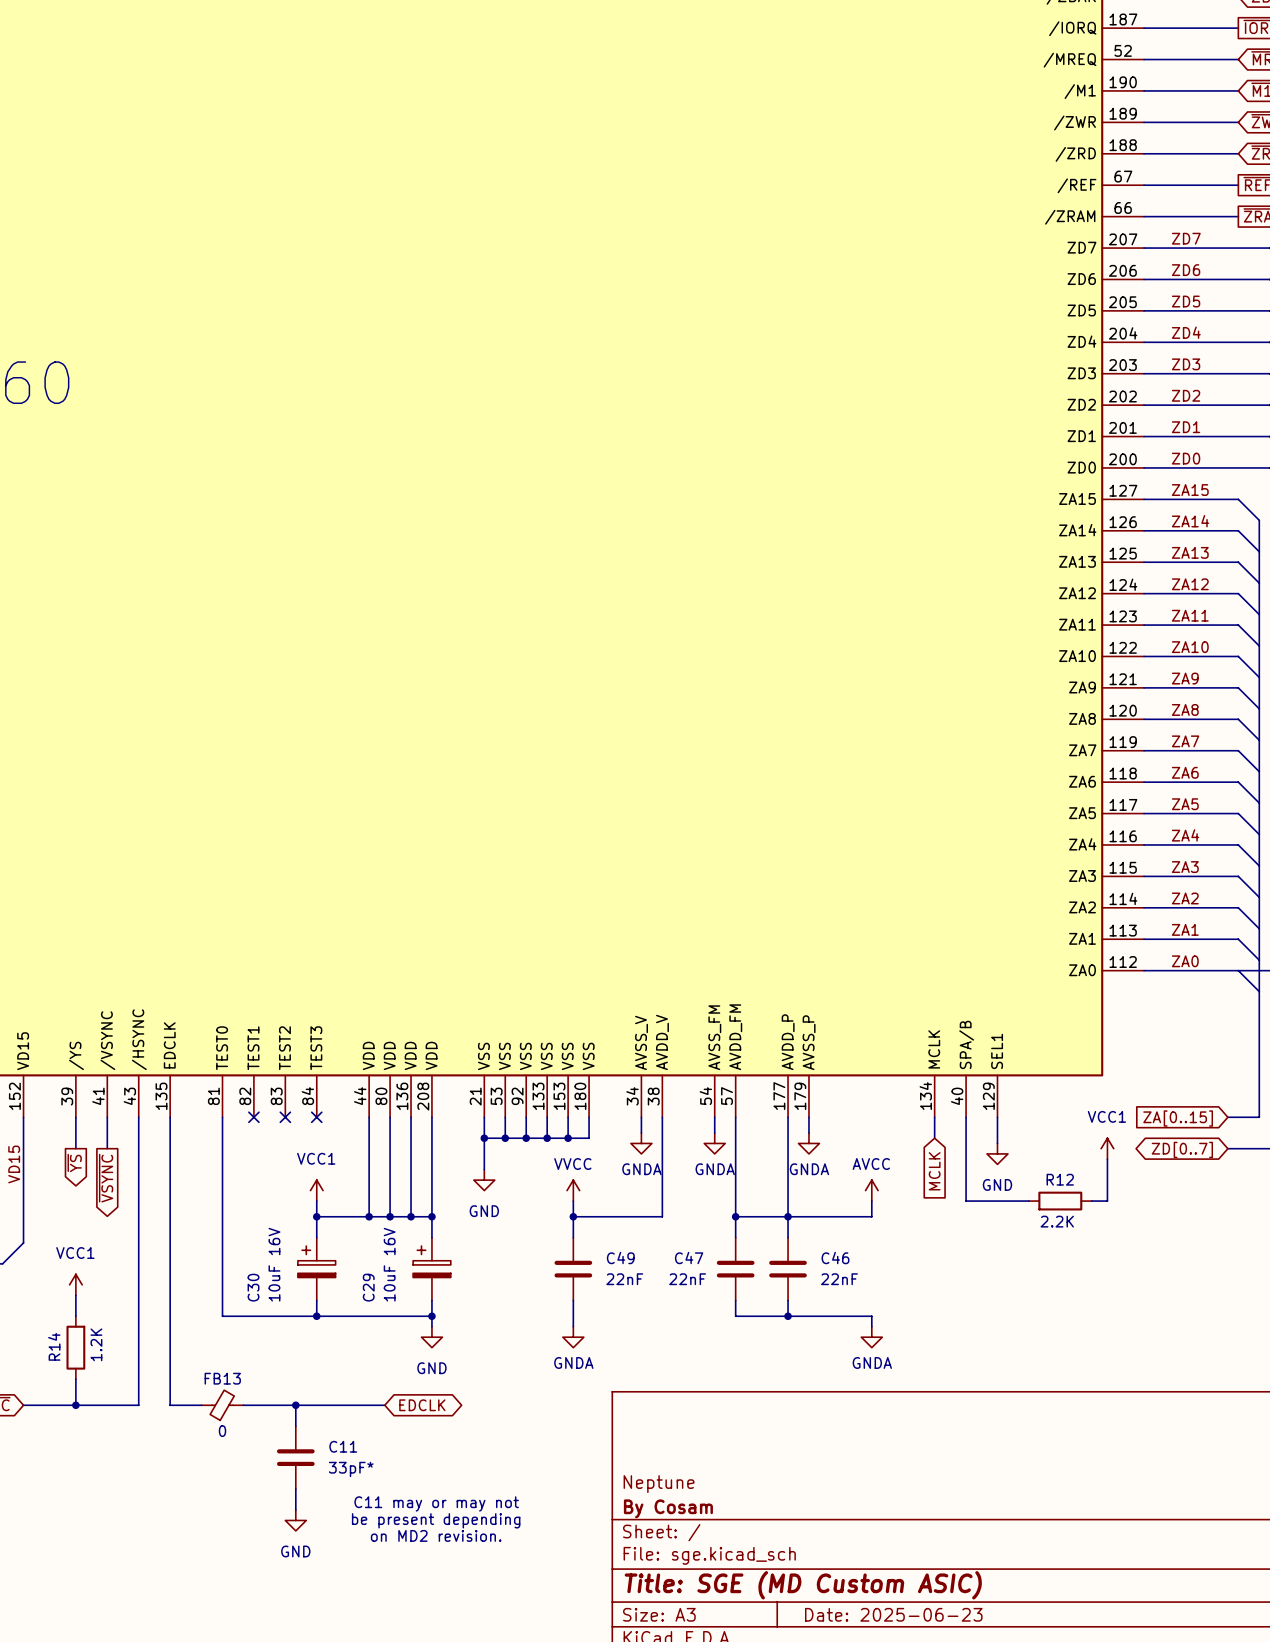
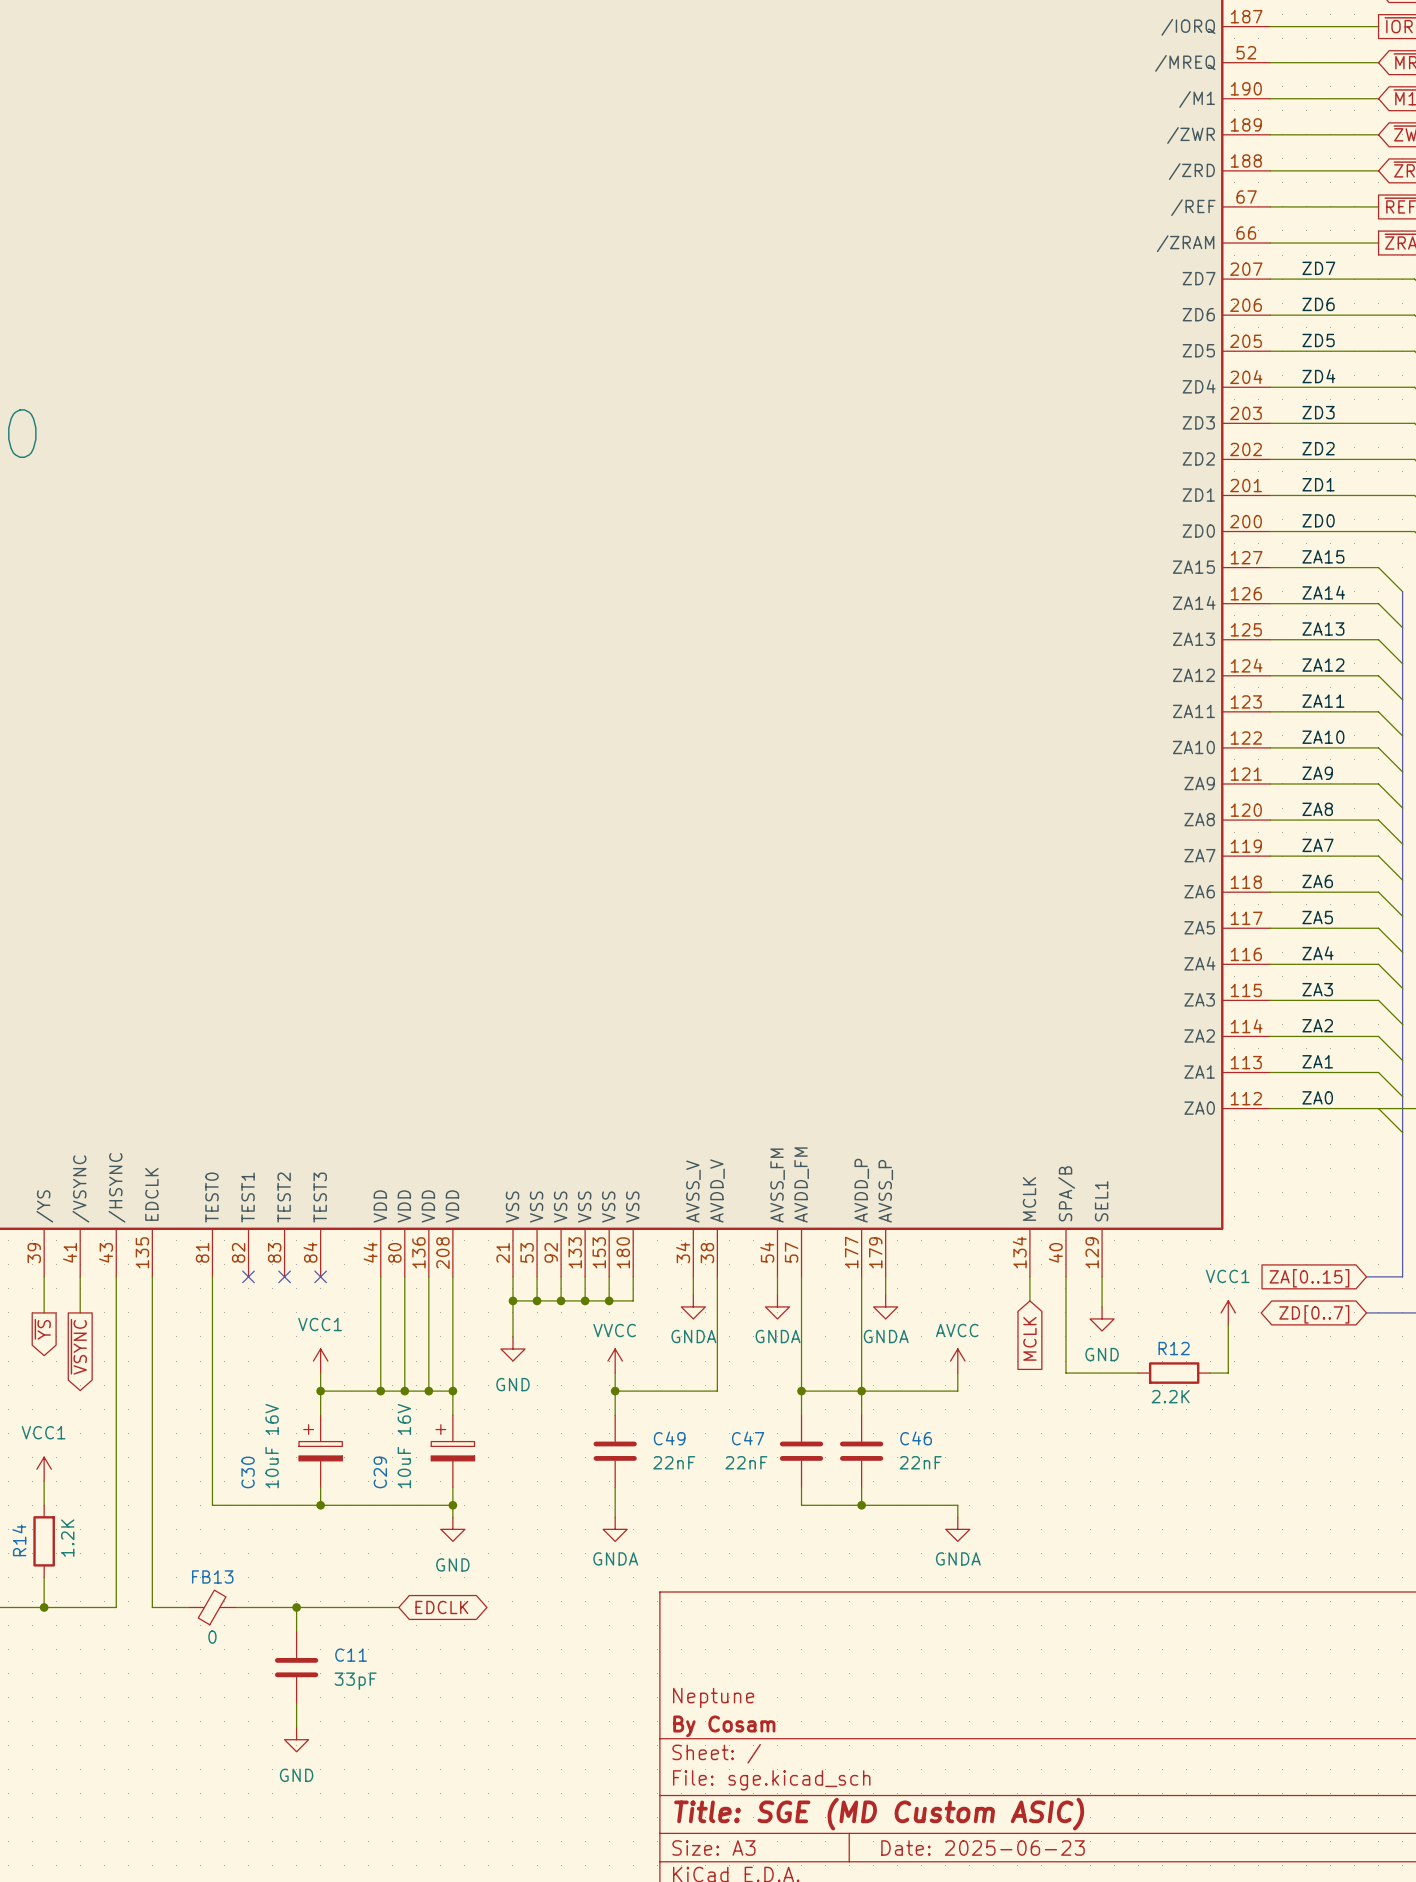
C11 value: 33pF* (351, 1469) -> 33pF (355, 1681)
text: C11 may or may not (436, 1503) -> none
text: be present depending (436, 1520) -> none
text: on MD2 revision. (436, 1535) -> none

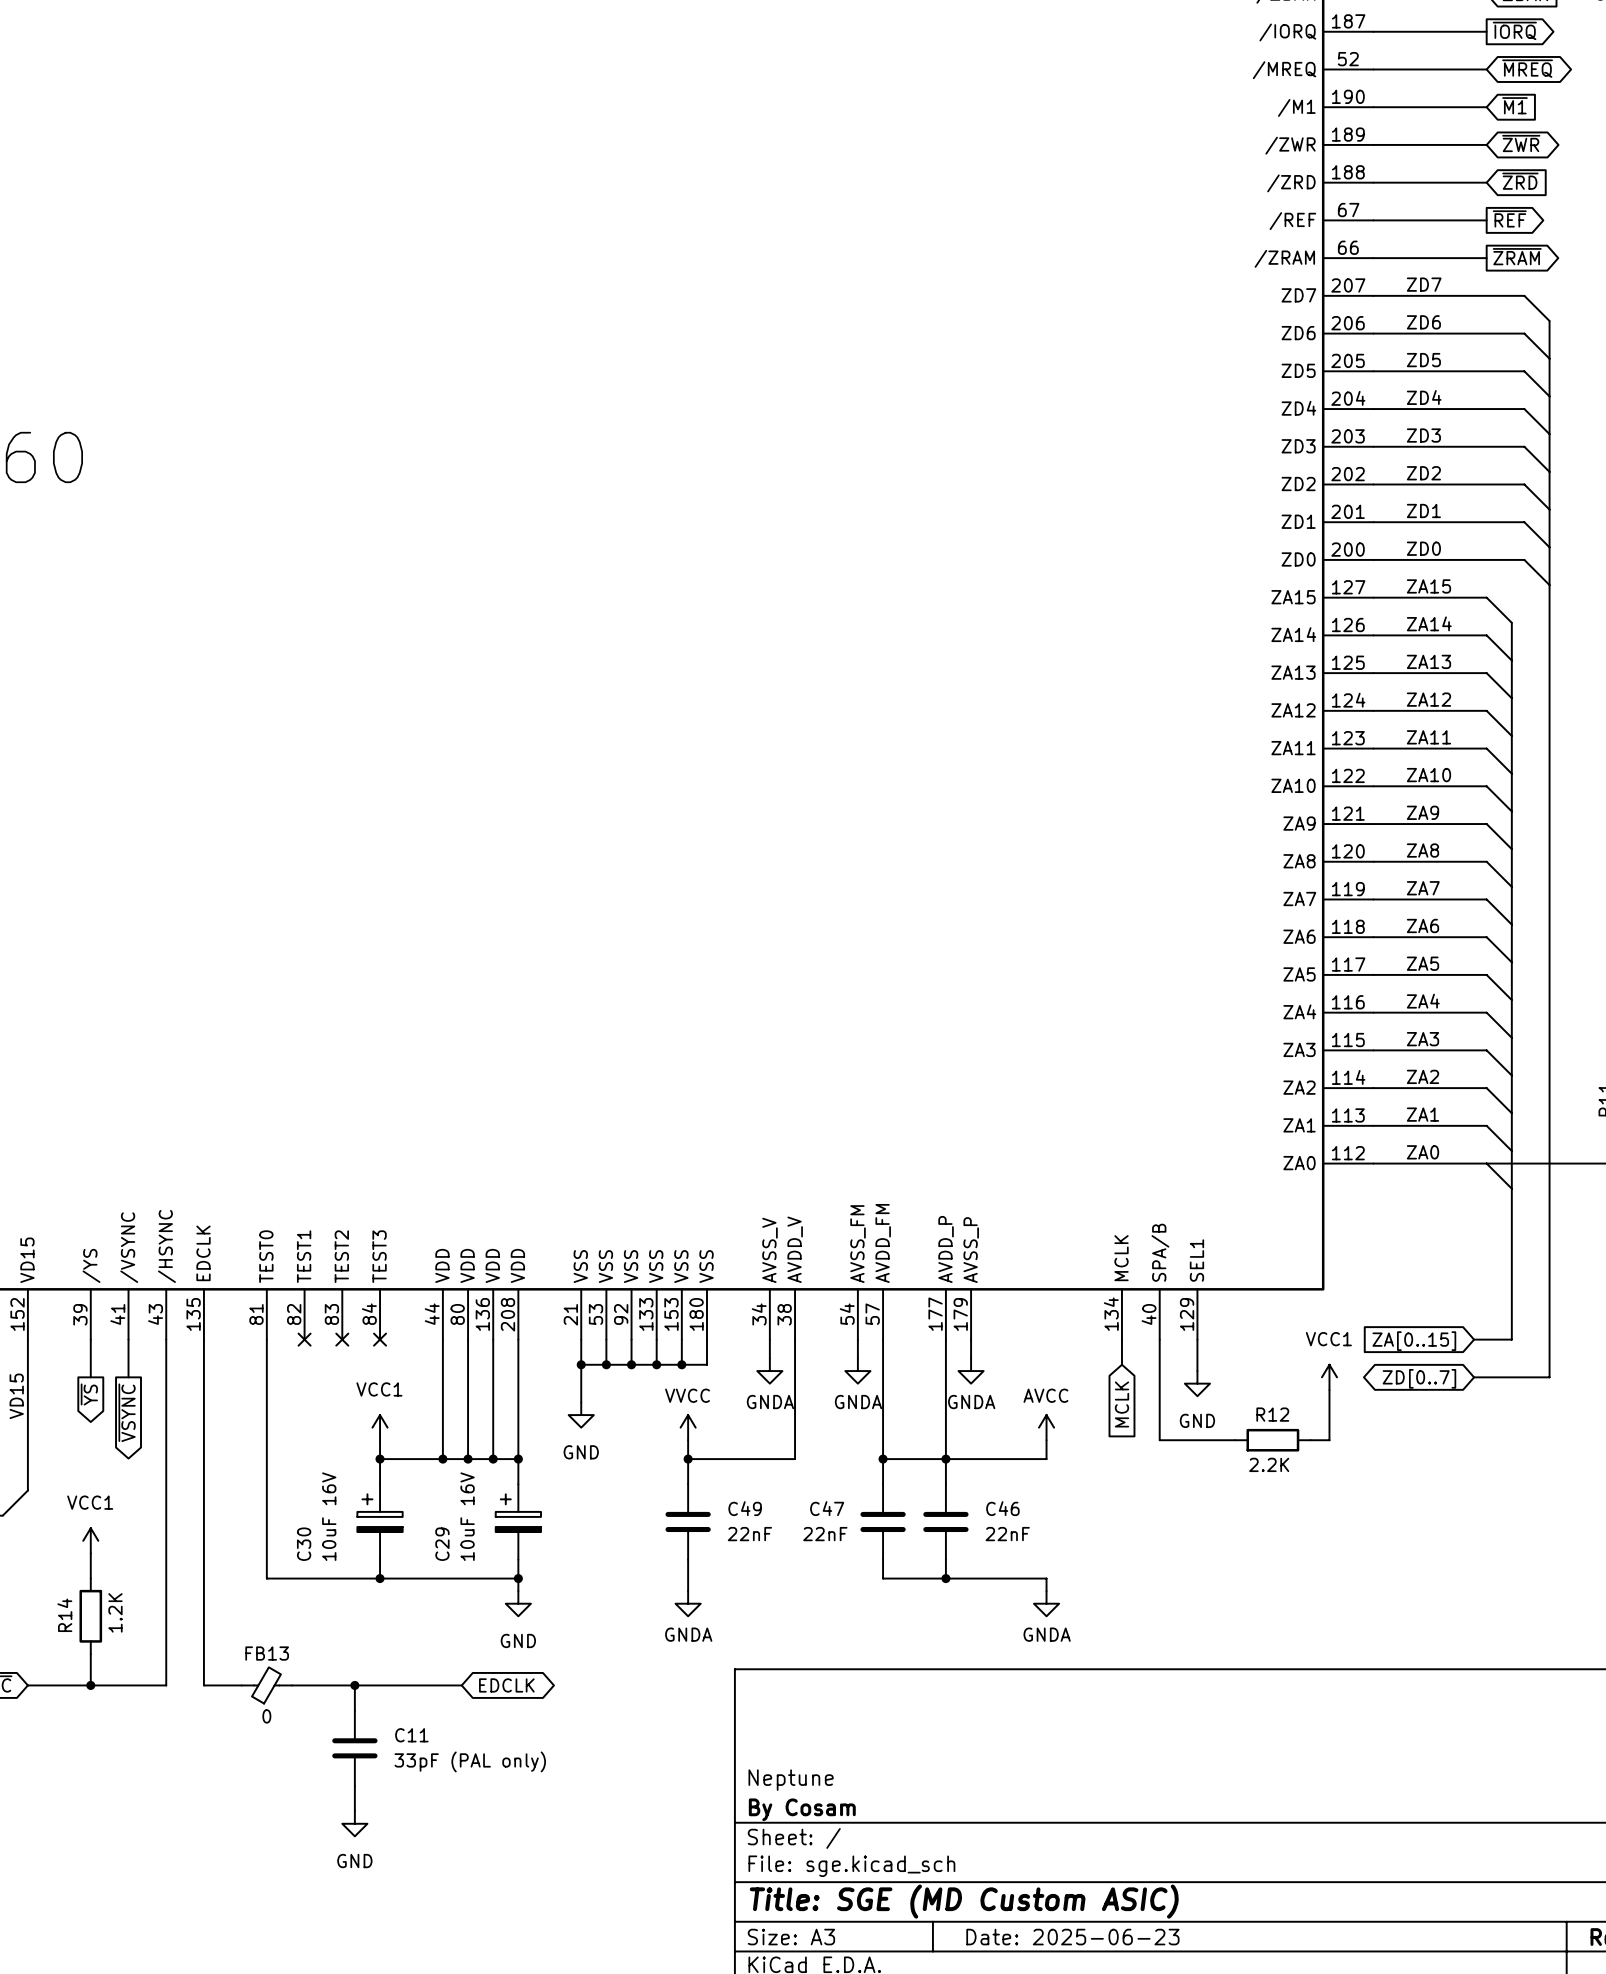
C11 value: 33pF (355, 1681) -> 33pF (PAL only) (470, 1761)

